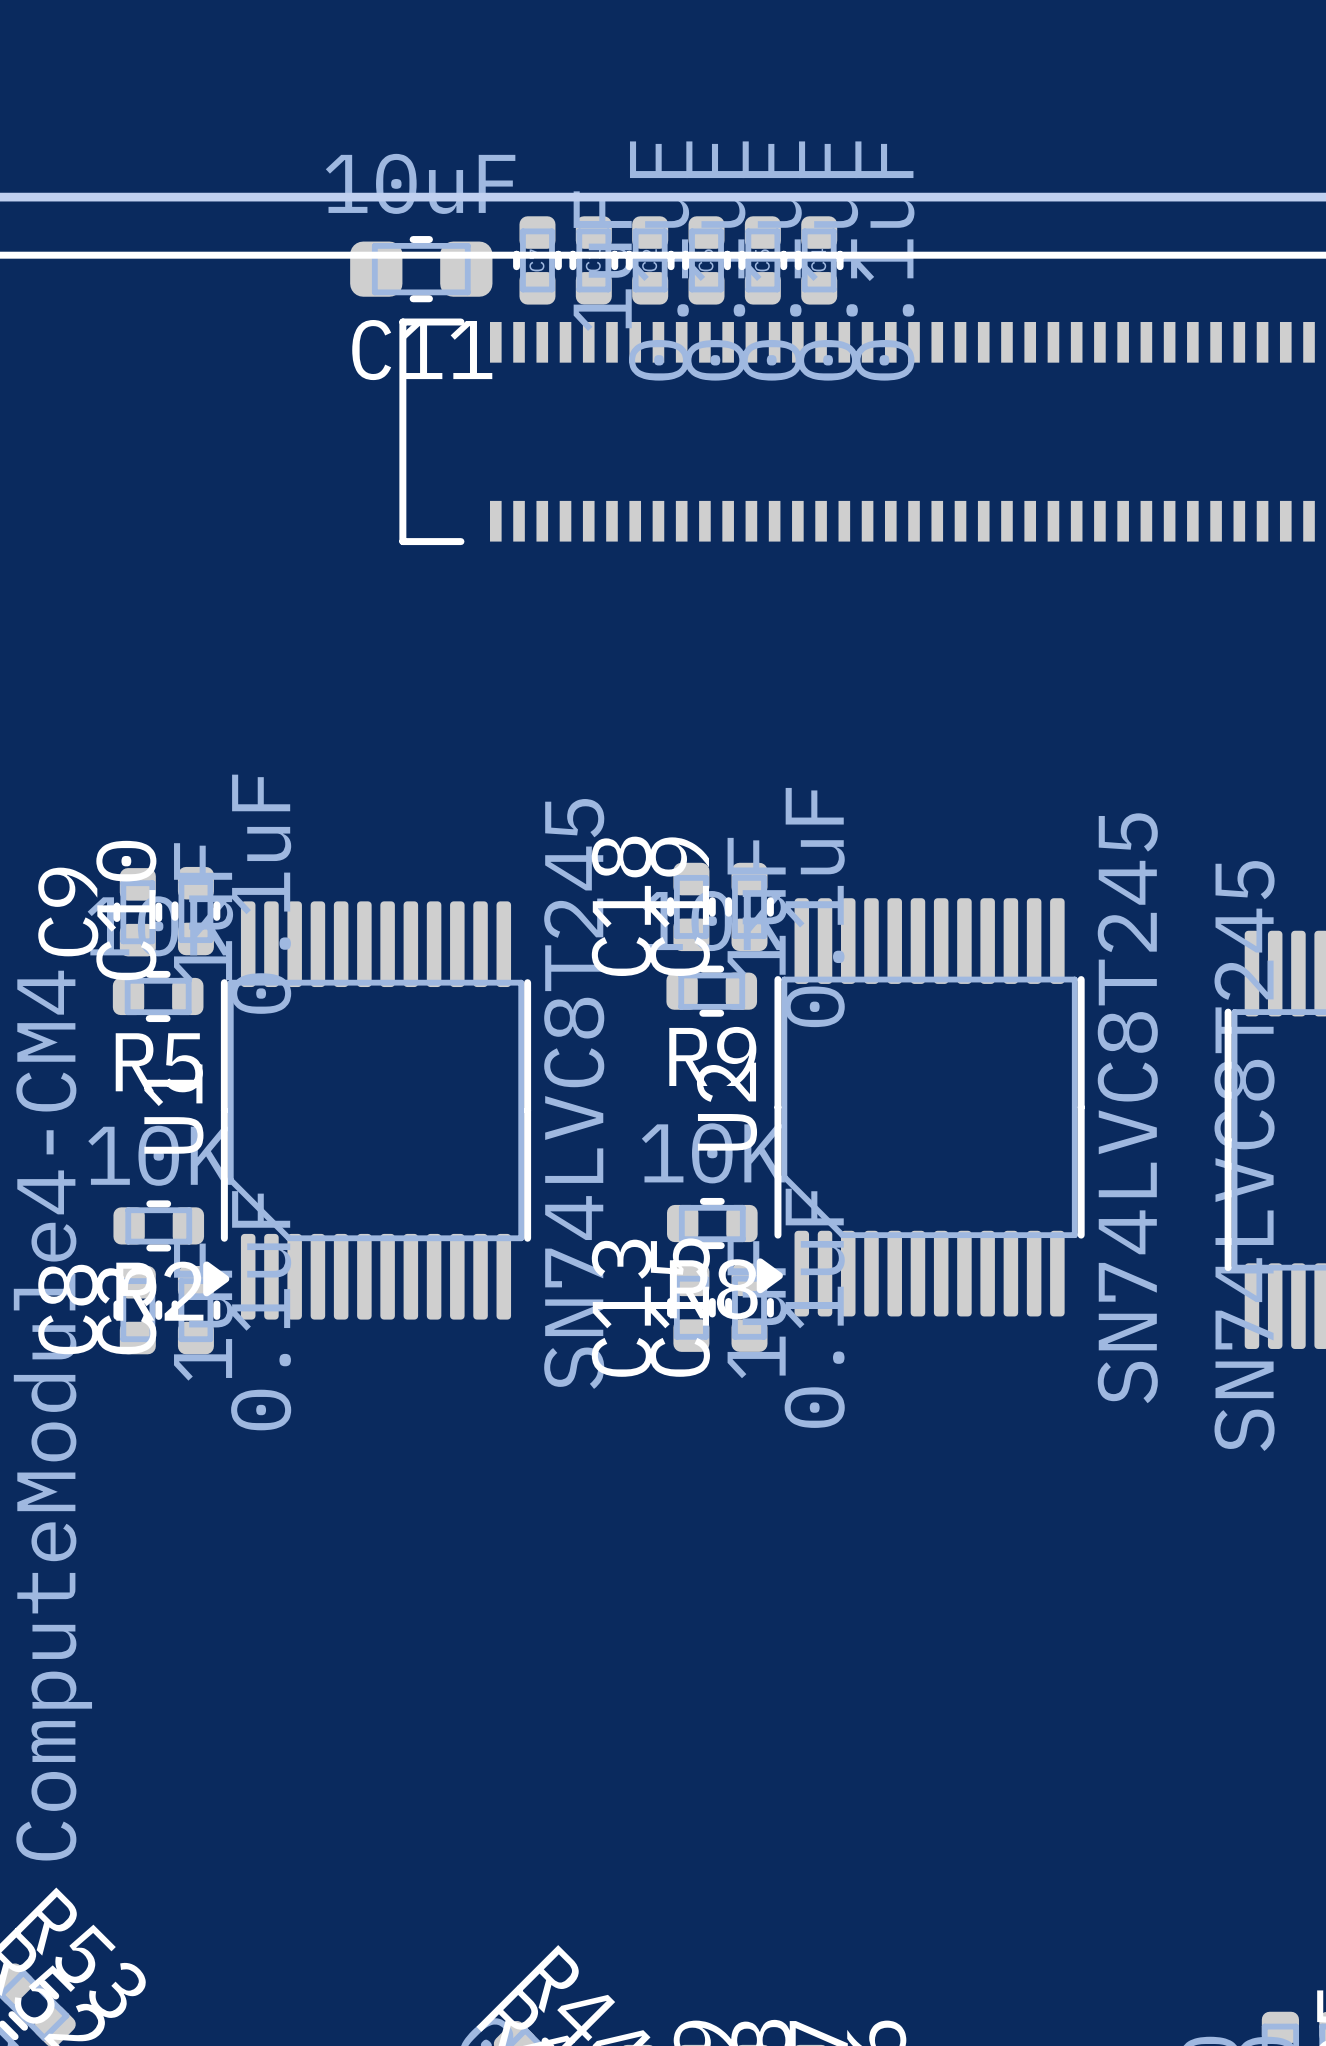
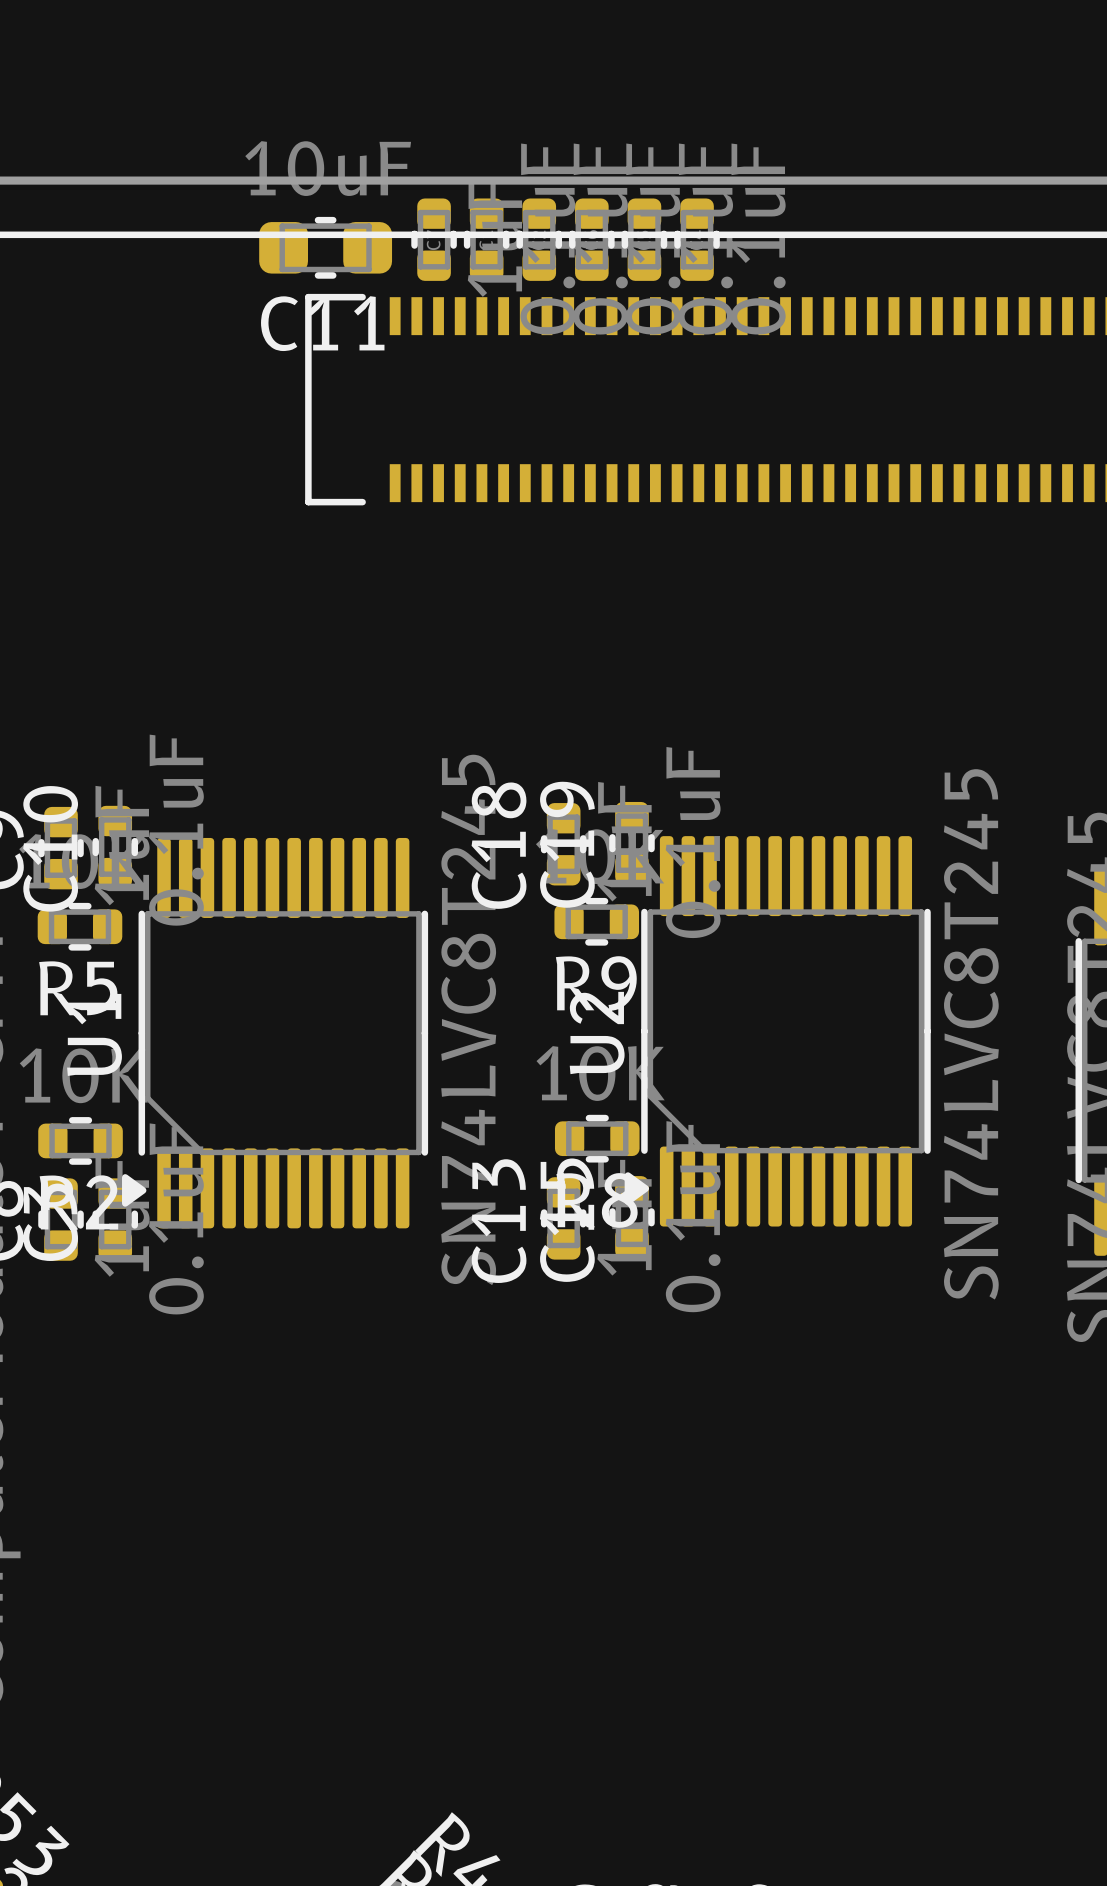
C18 position: (691, 906) -> (563, 844)
U2 position: (920, 1107) -> (777, 1031)
C13 position: (691, 1307) -> (563, 1218)

